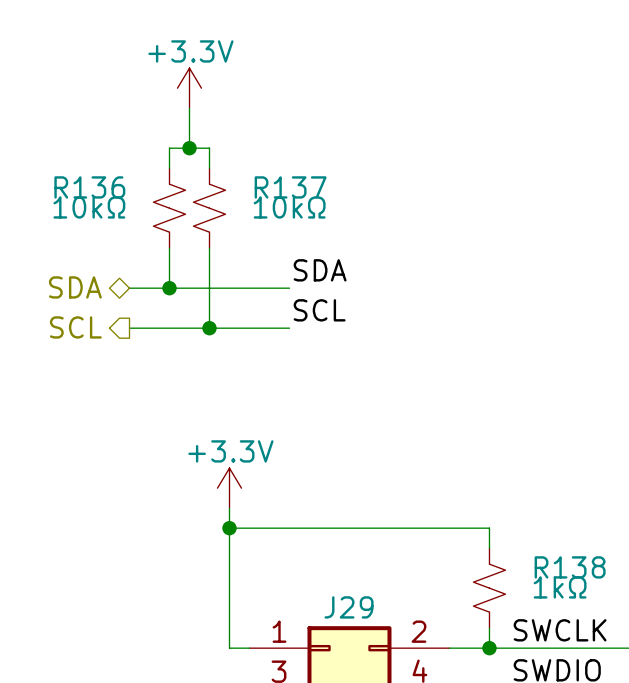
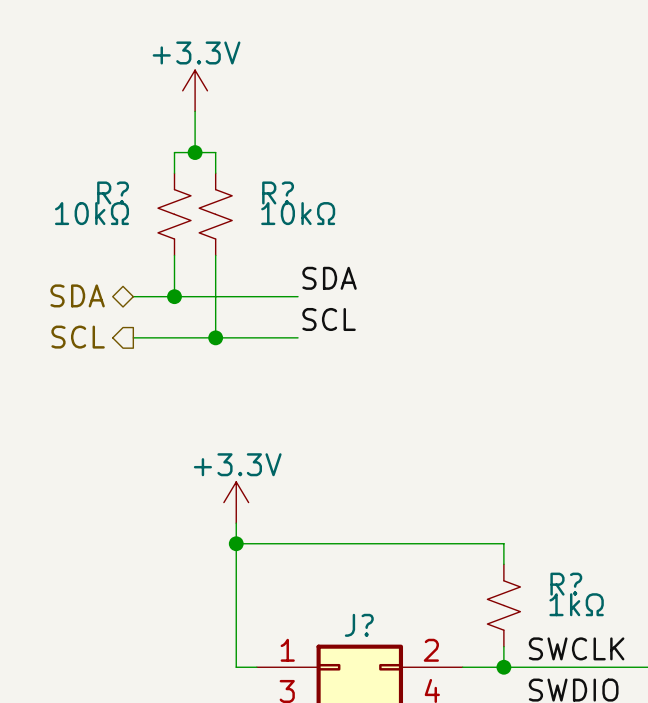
R136 name: R136 (89, 187) -> R? (113, 192)
R137 name: R137 (290, 187) -> R? (278, 192)
R138 name: R138 (570, 567) -> R? (566, 584)
J29 name: J29 (349, 607) -> J? (359, 625)

